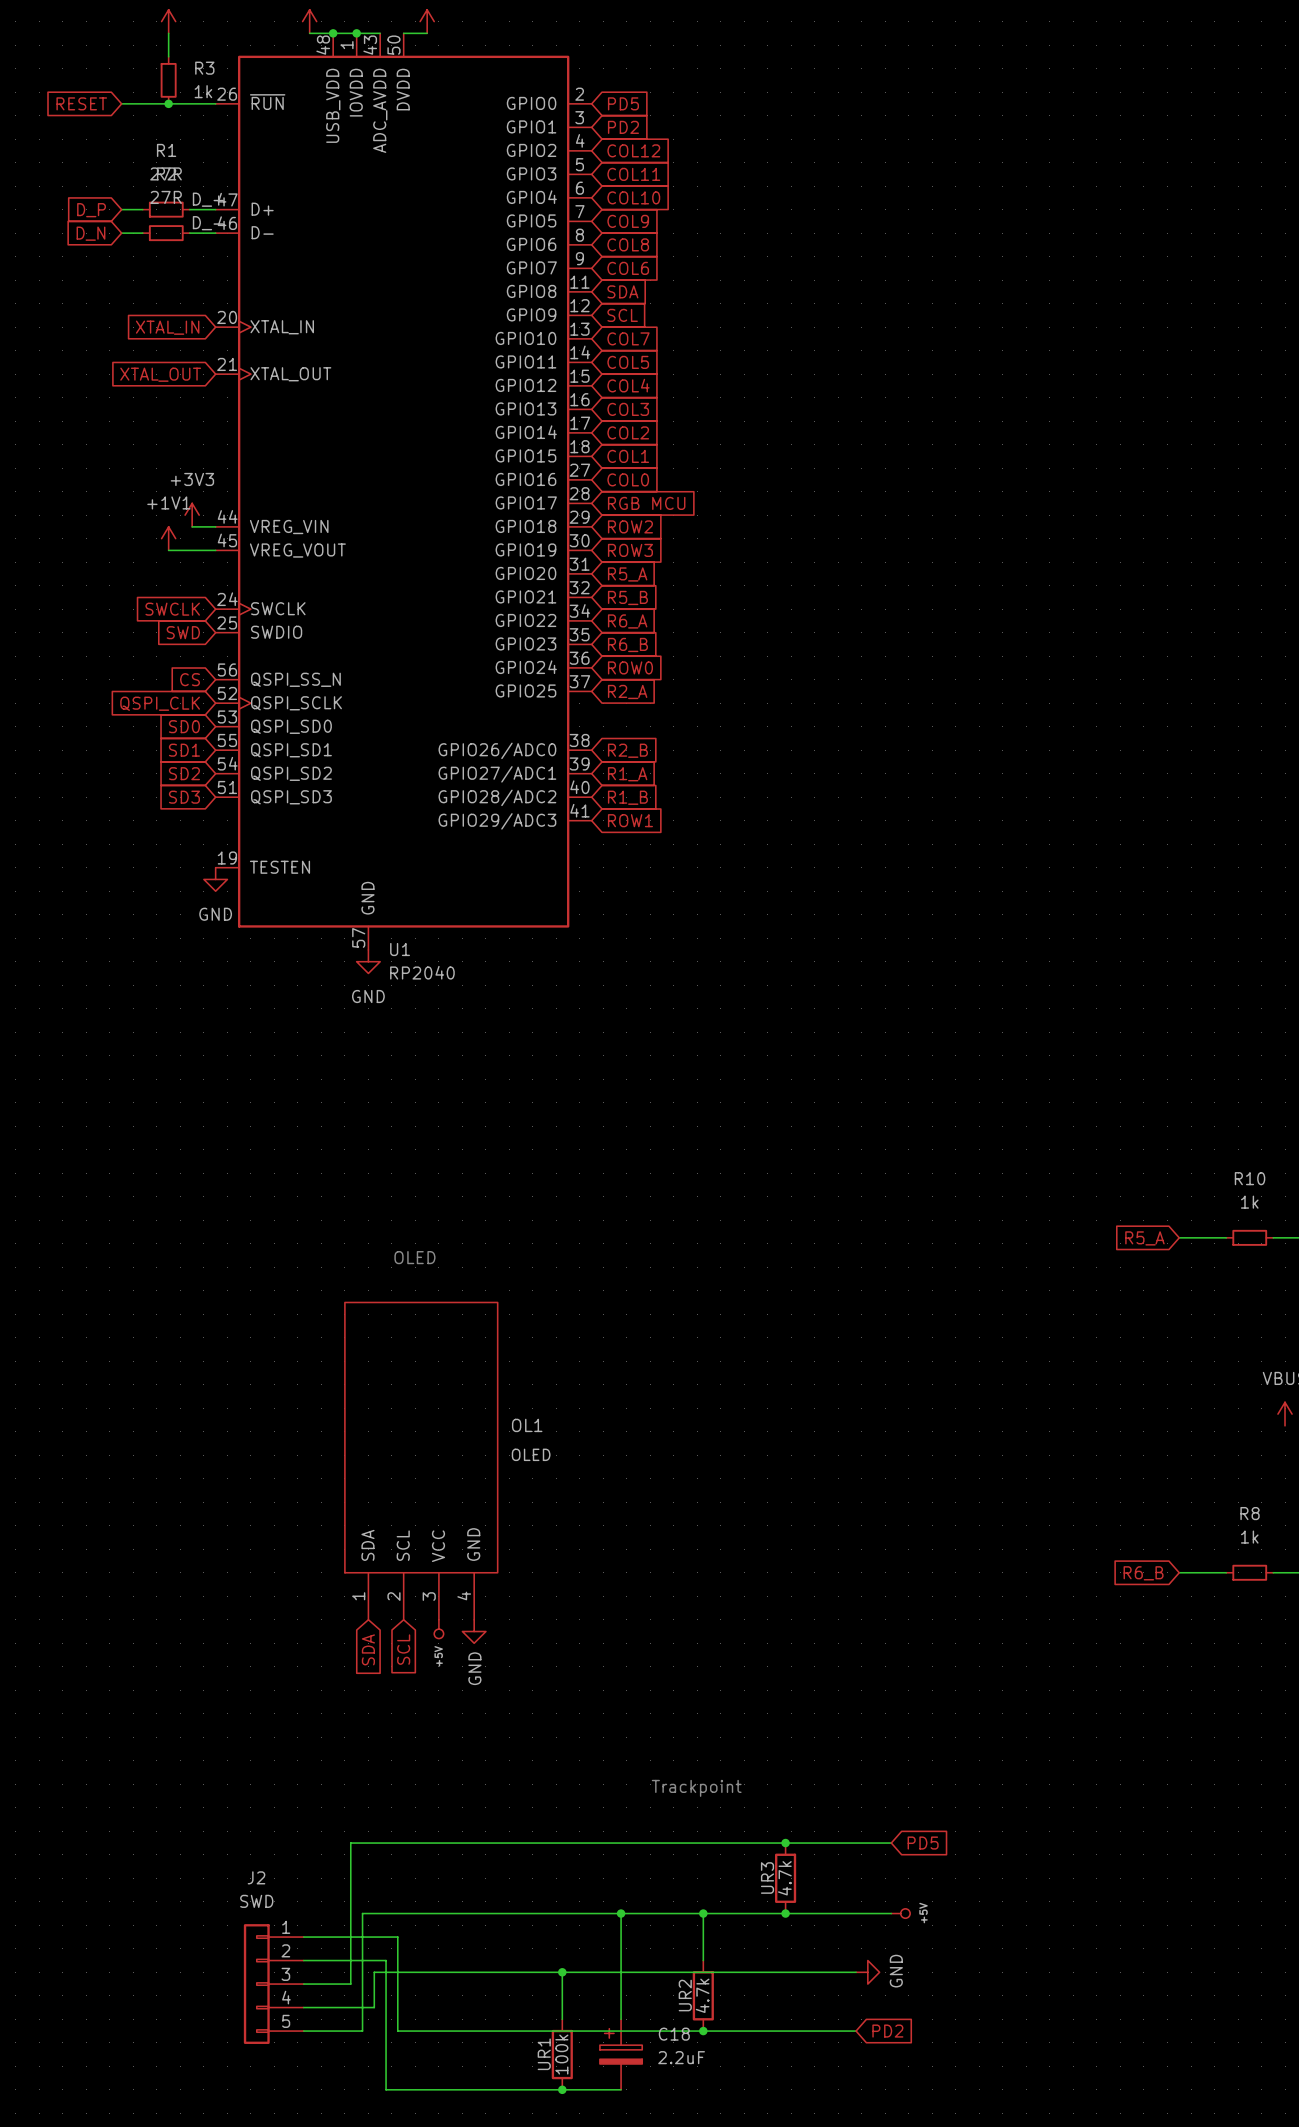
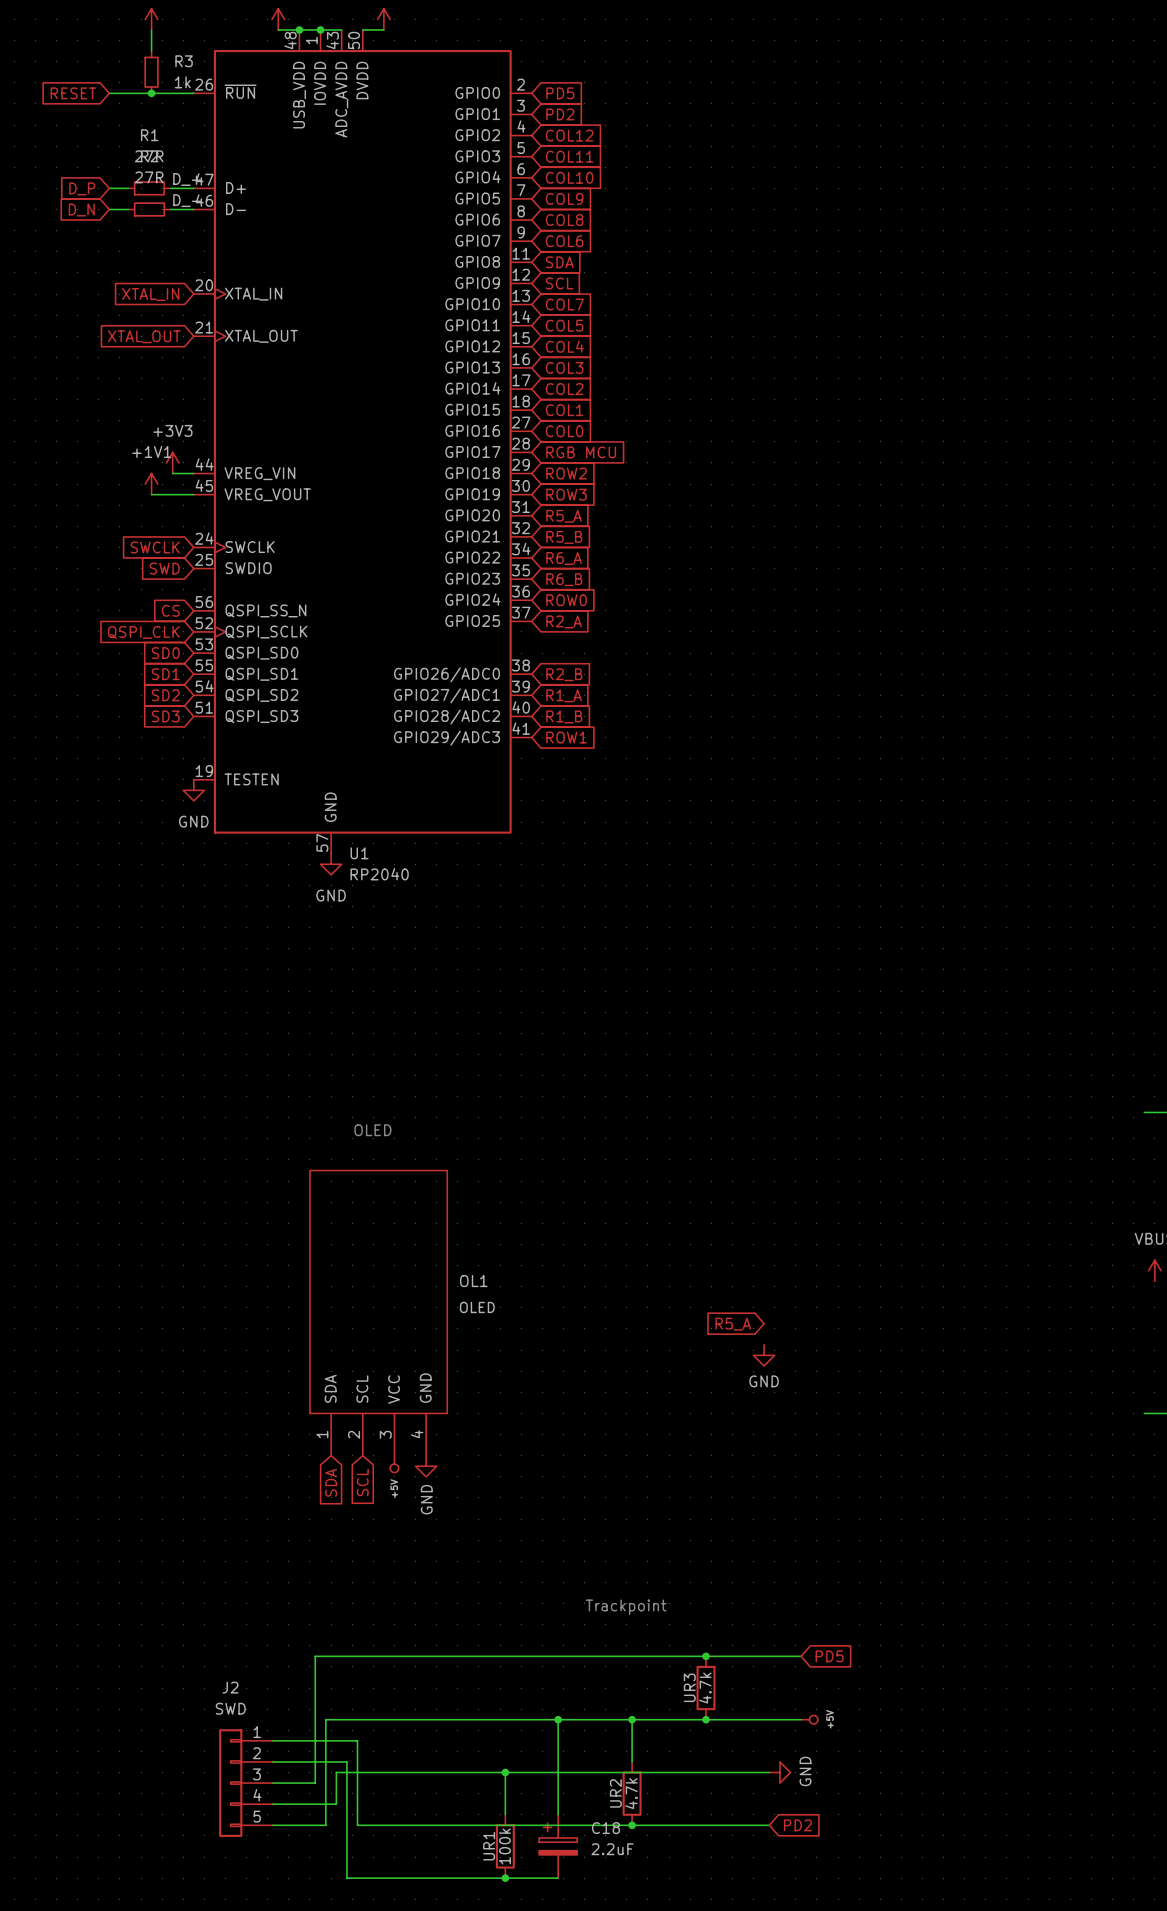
wire: (1179, 1237) (1226, 1237) -> none
R10: 1k (1249, 1237) -> none
global label: R5_A (1144, 1238) -> none
global label: none -> R5_A (733, 1324)
power symbol: none -> GND (764, 1355)
wire: (1179, 1572) (1226, 1572) -> none
R8: 1k (1249, 1572) -> none
global label: R6_B (1143, 1573) -> none

